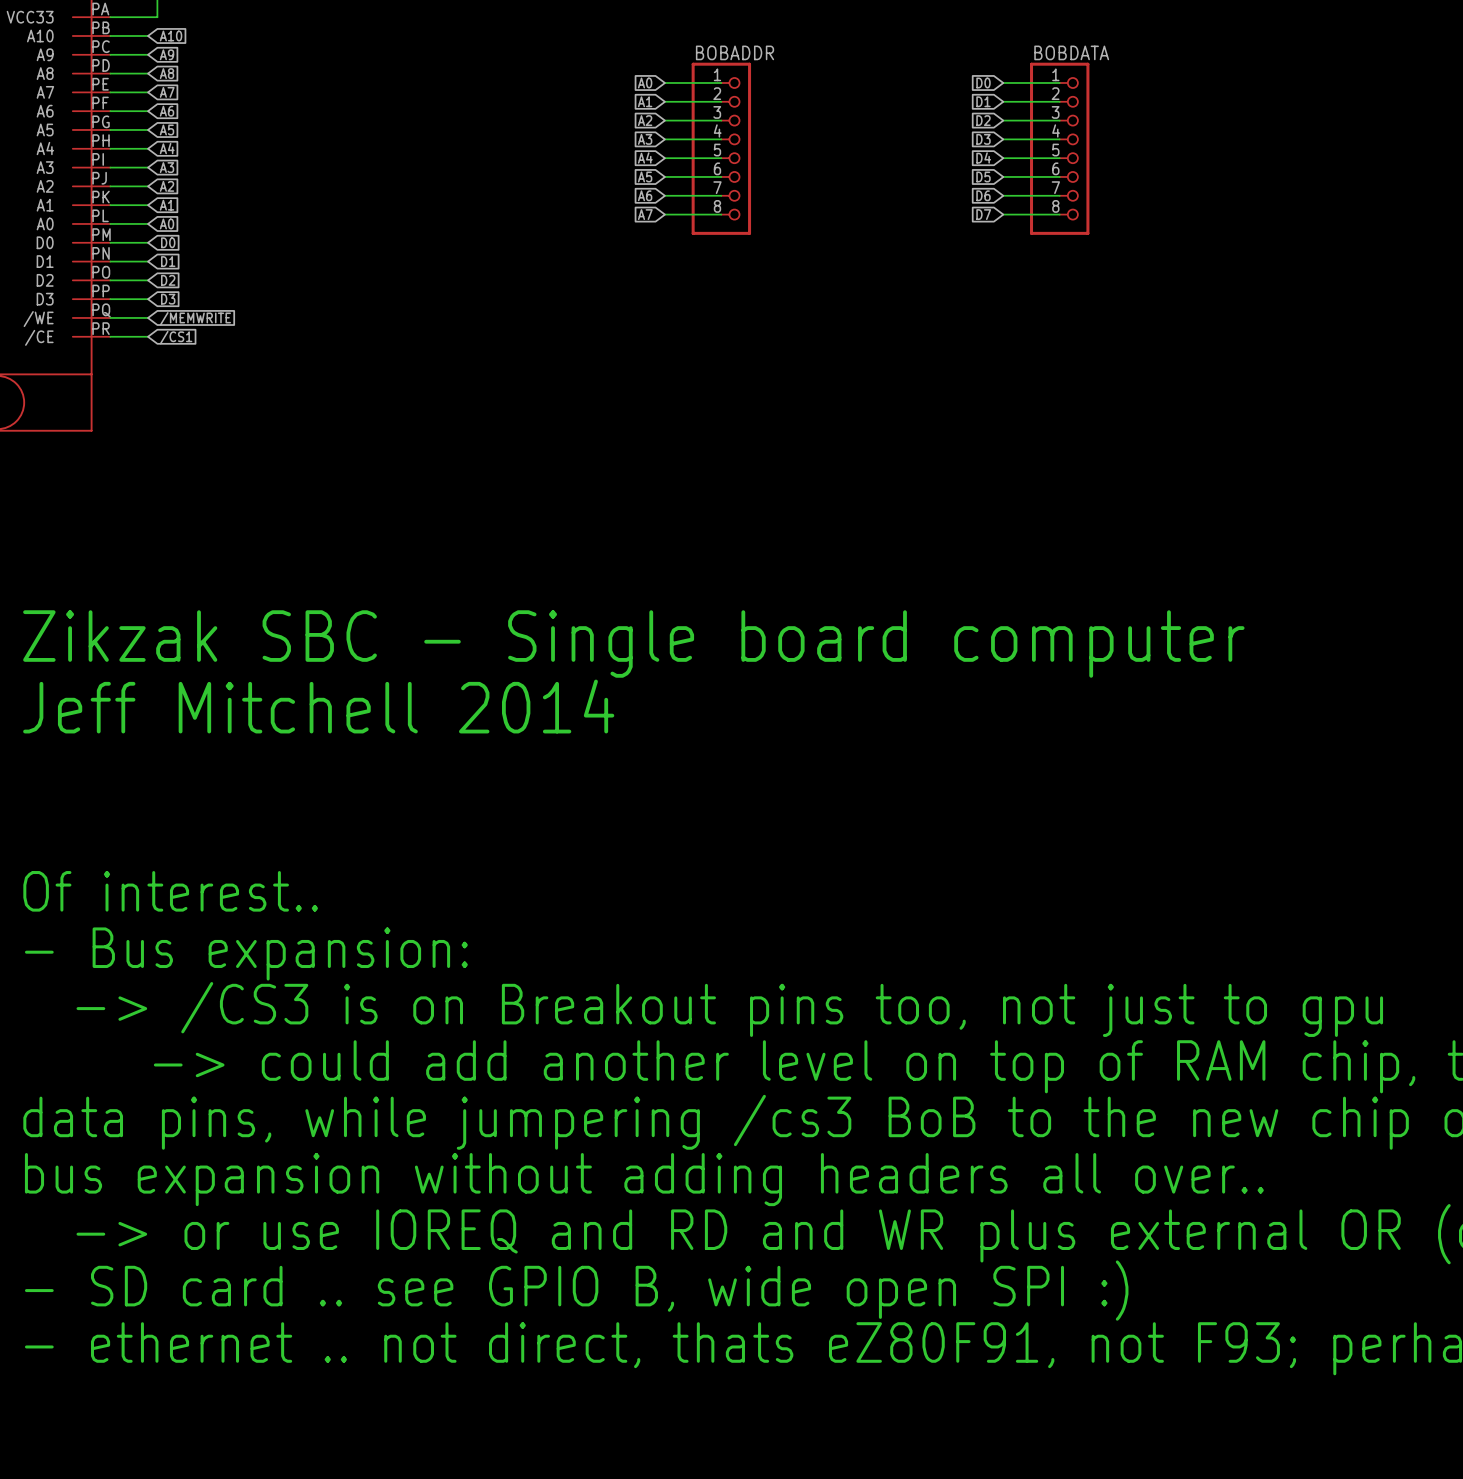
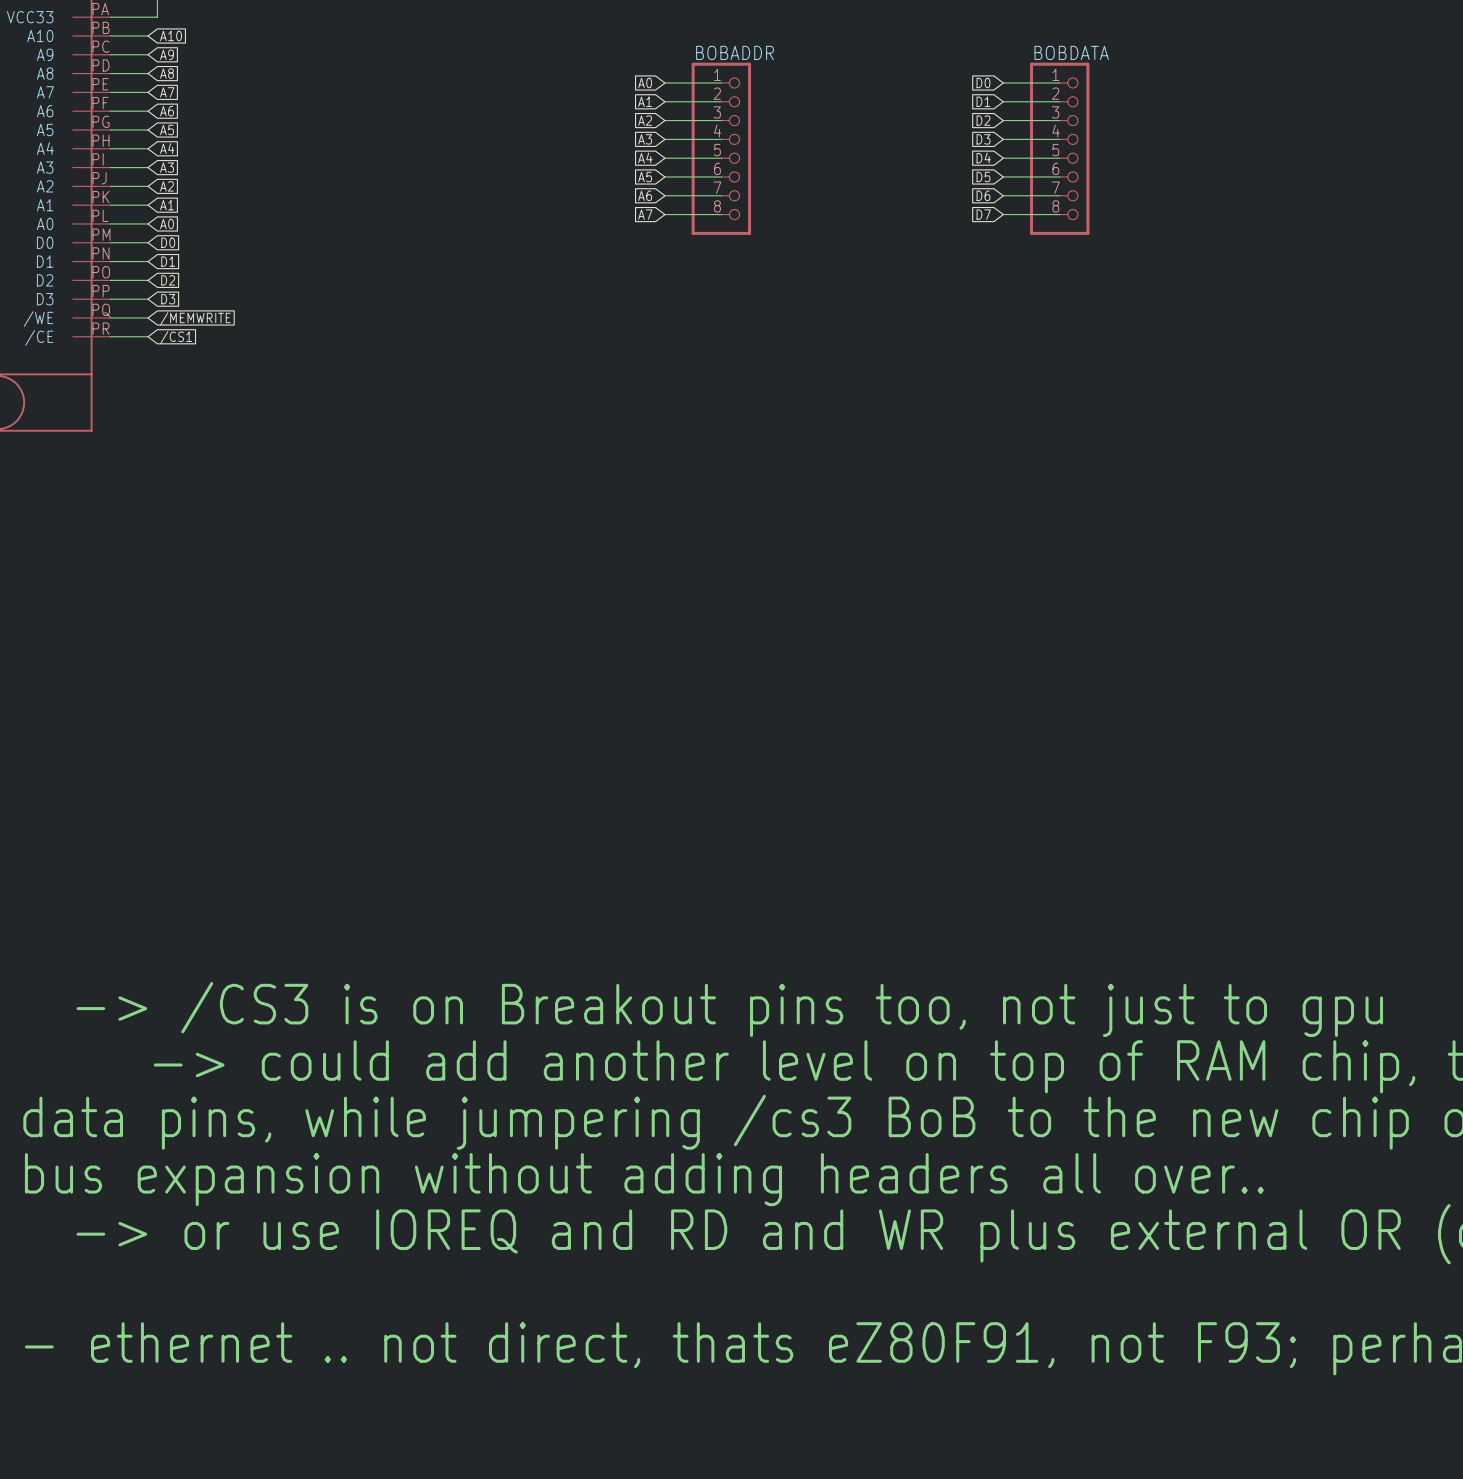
text: Zikzak SBC - Single board computer (633, 644) -> none
text: Jeff Mitchell 2014 (318, 706) -> none
text: Of interest.. (170, 891) -> none
text: - Bus expansion: (246, 953) -> none
text: - SD card .. see GPIO B, wide open SPI :) (576, 1290) -> none

